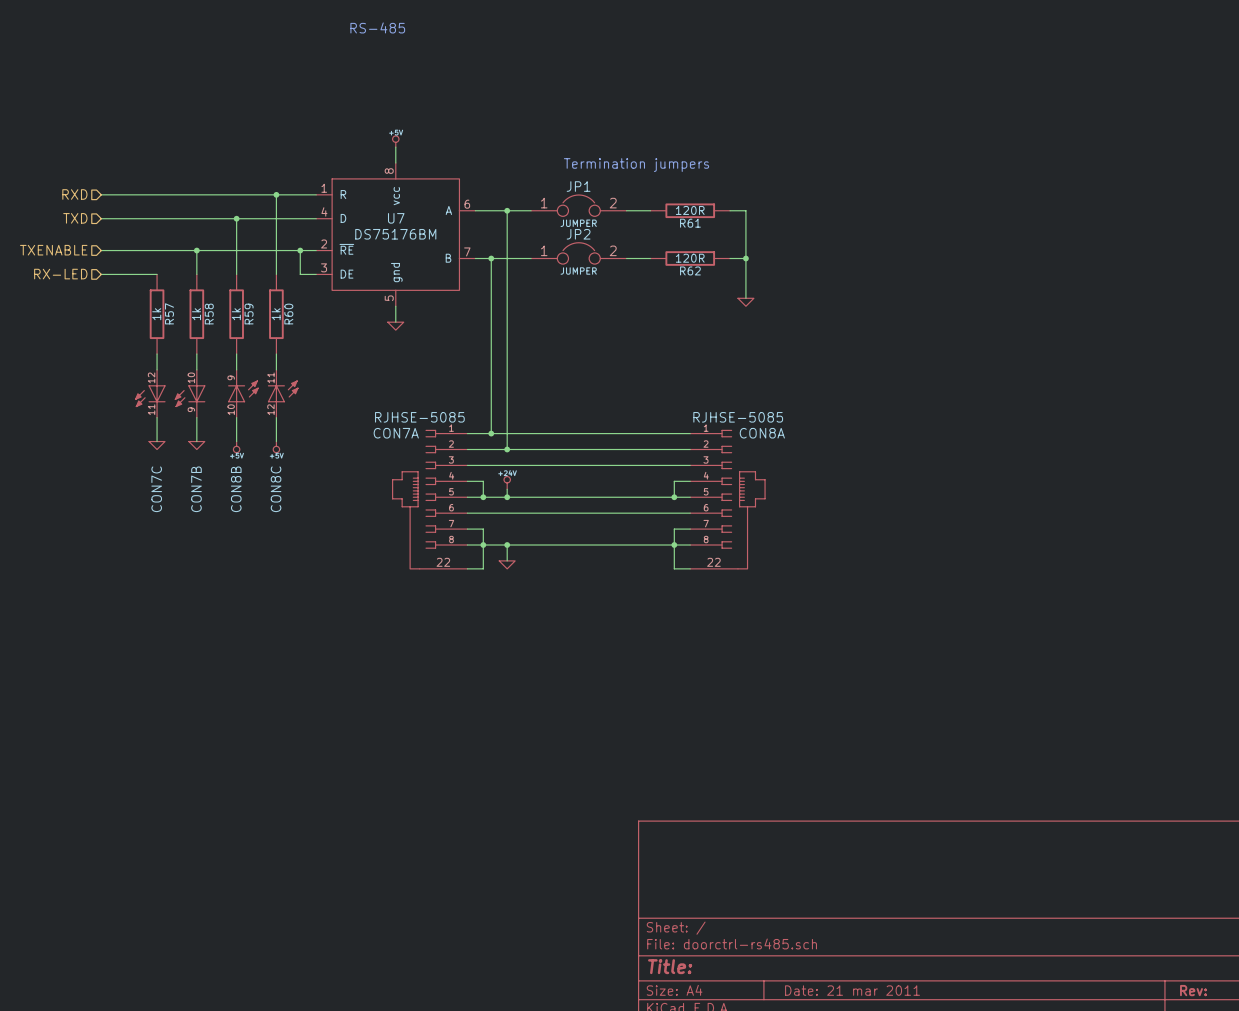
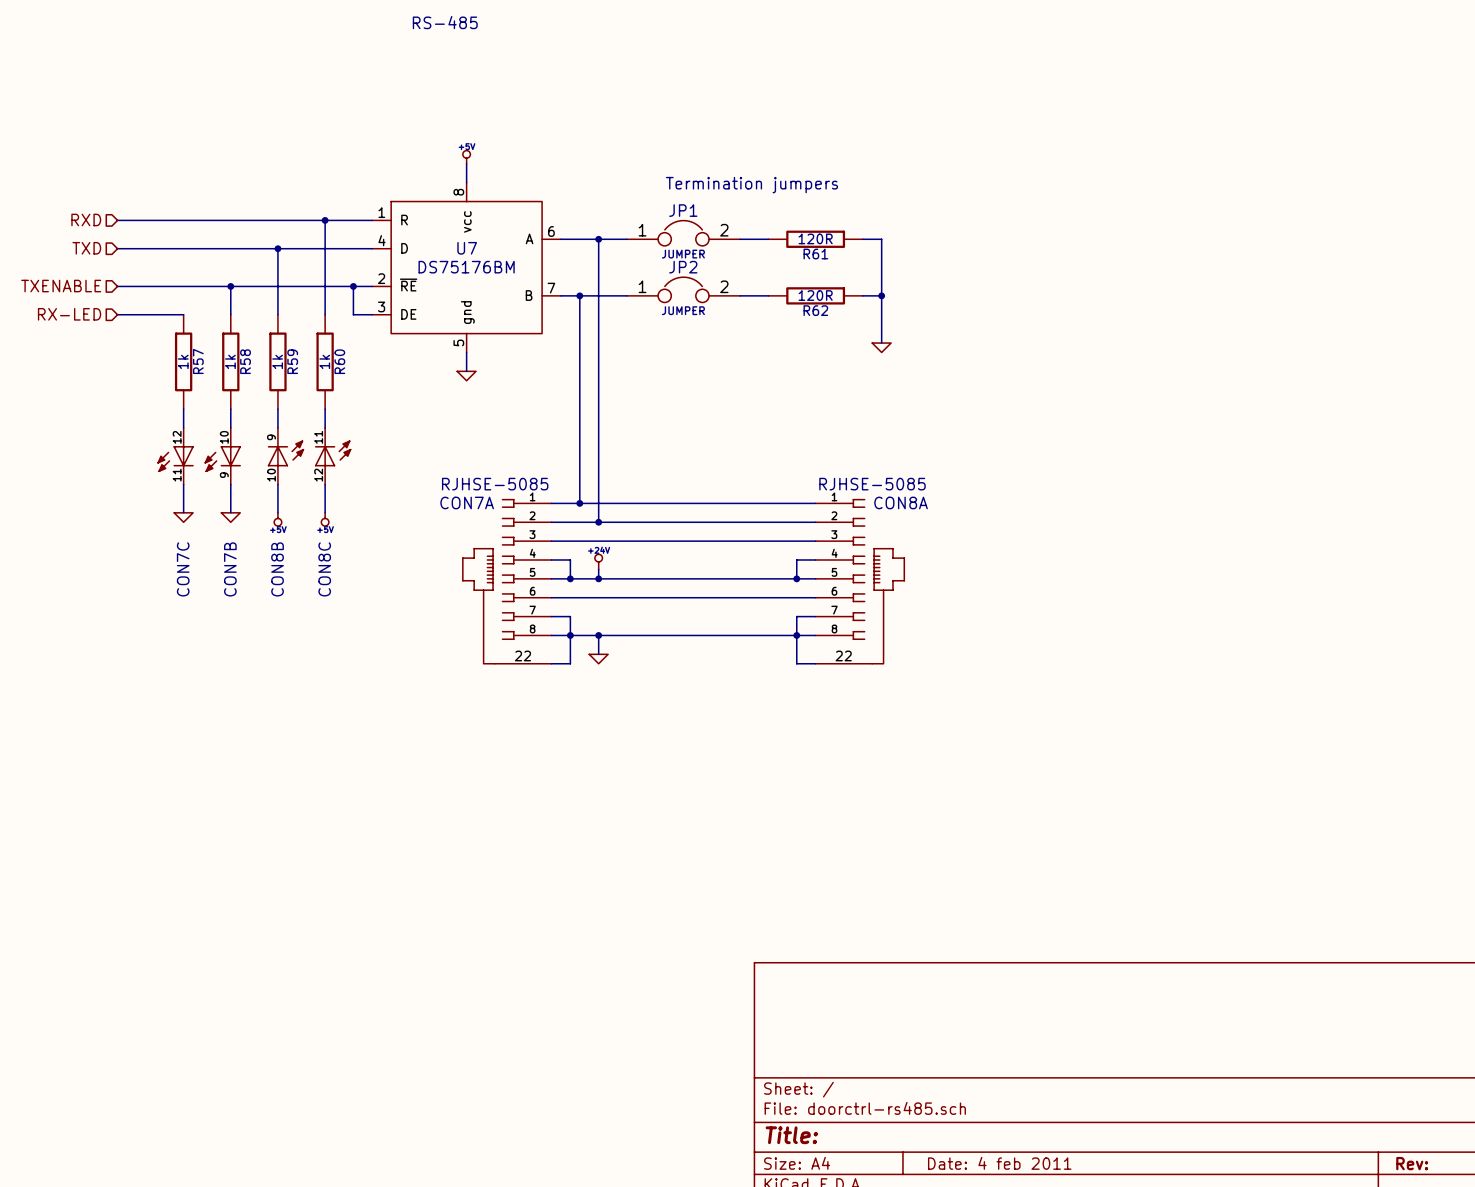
title block: Date: 21 mar 2011 (852, 990) -> Date: 4 feb 2011 (999, 1163)

